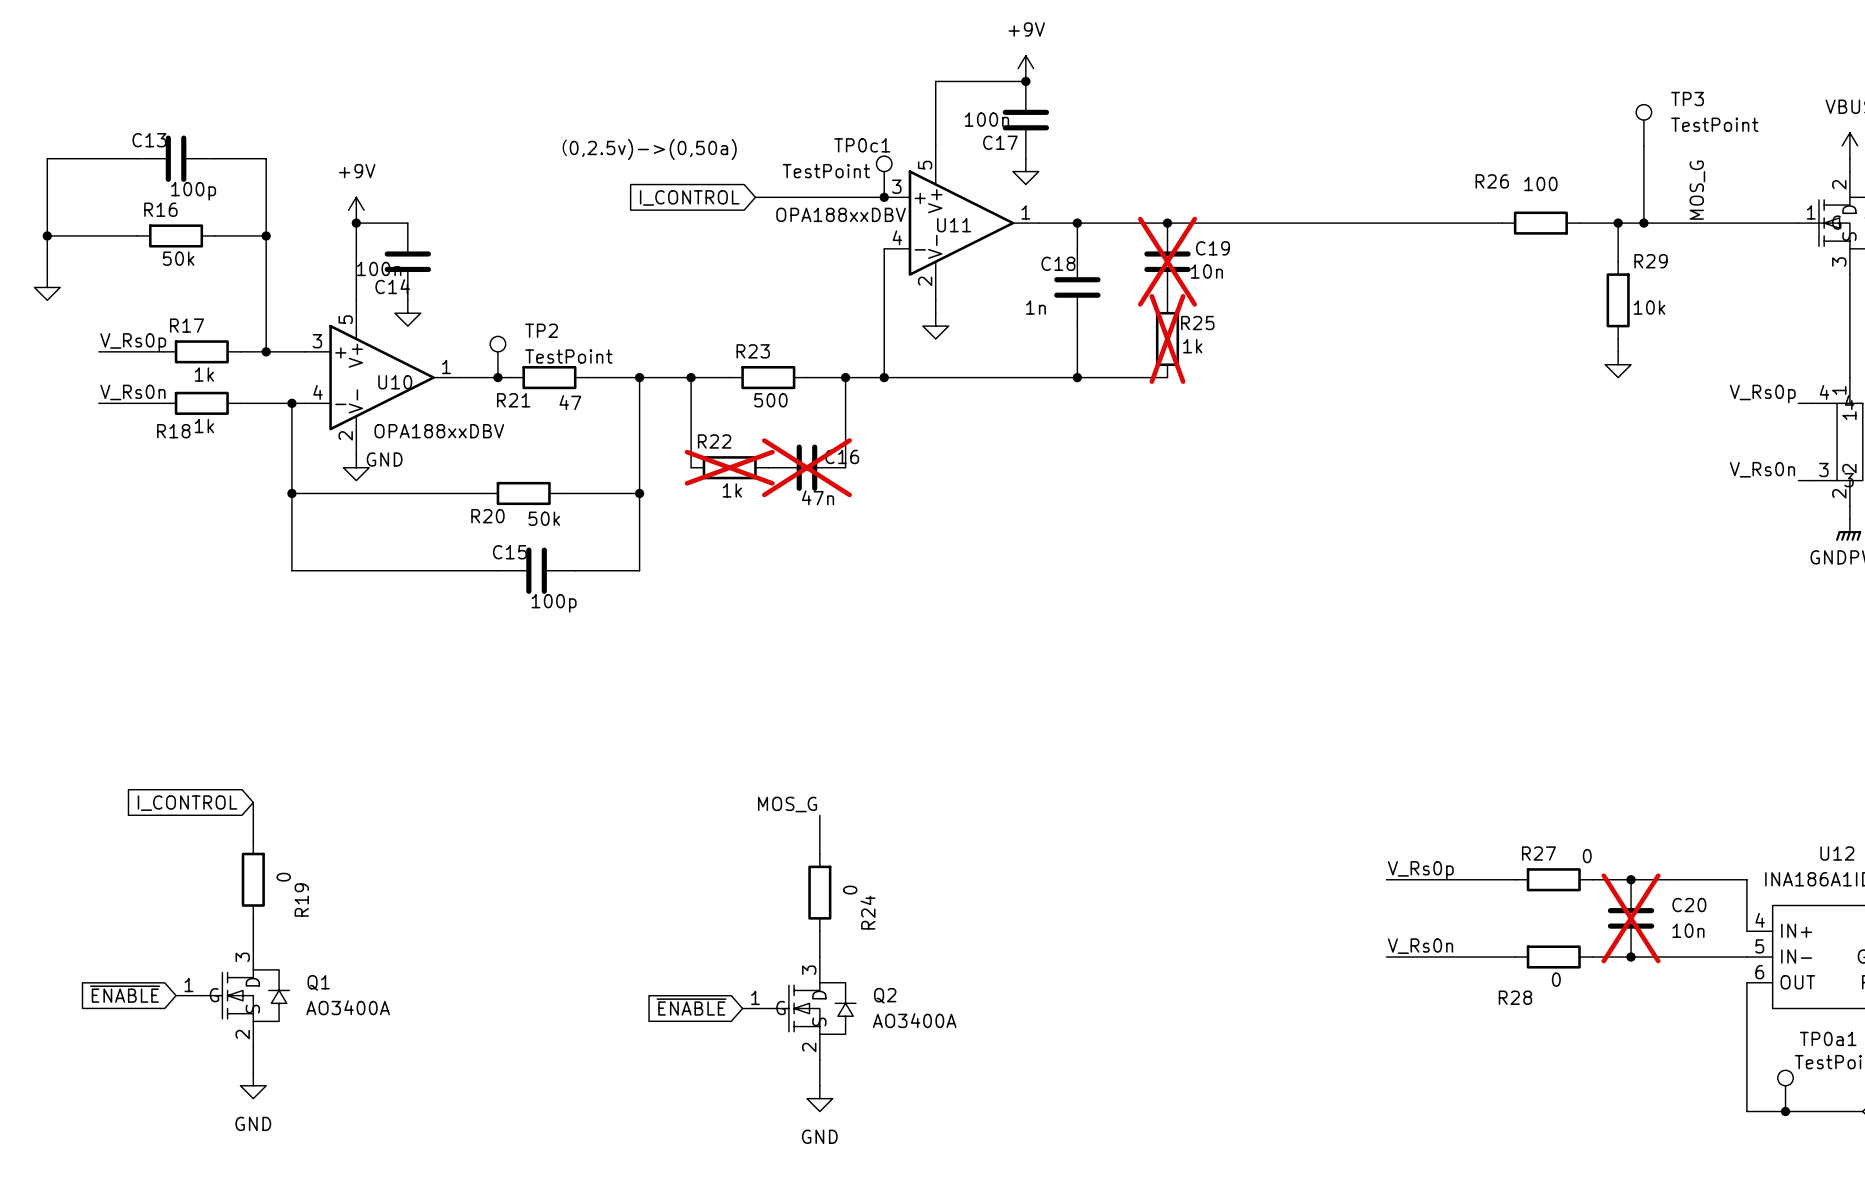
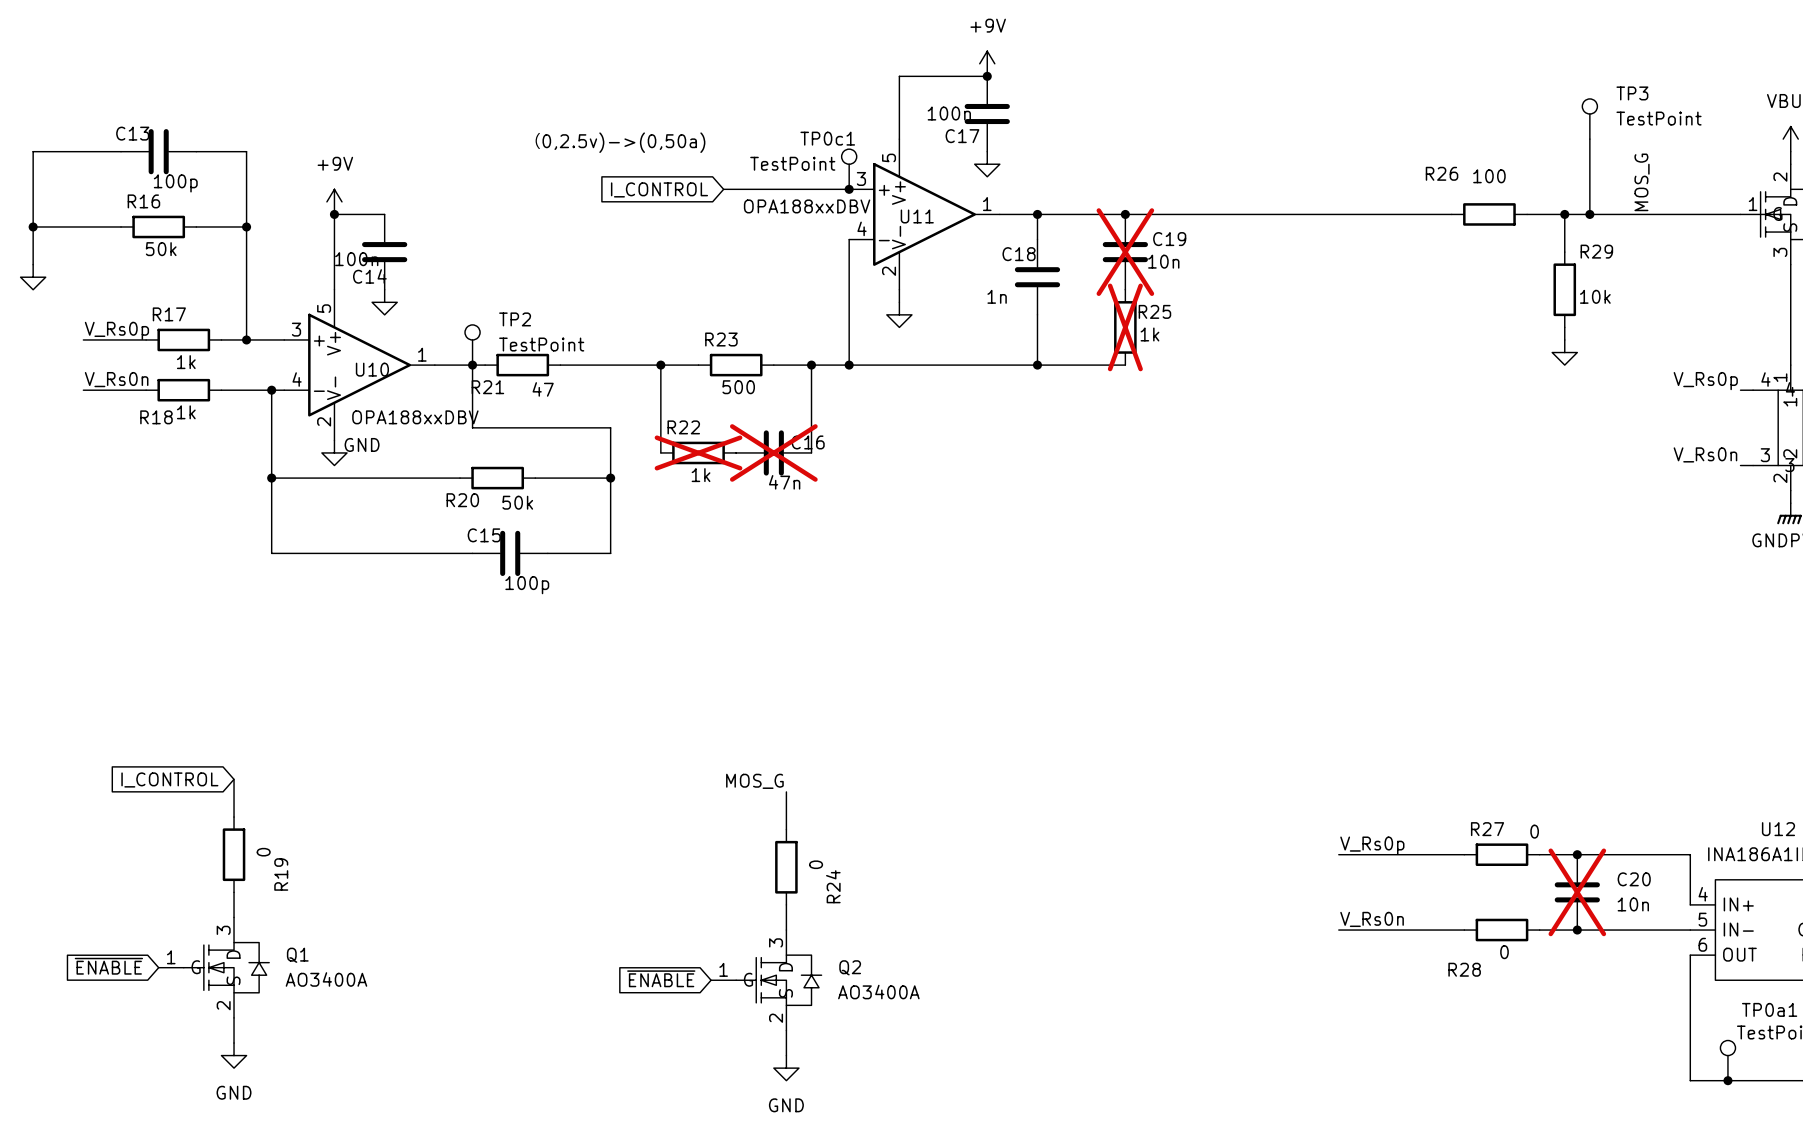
wire: (639, 377) (639, 441) -> (472, 365) (472, 427) (610, 427)
junction: (639, 377) -> none

